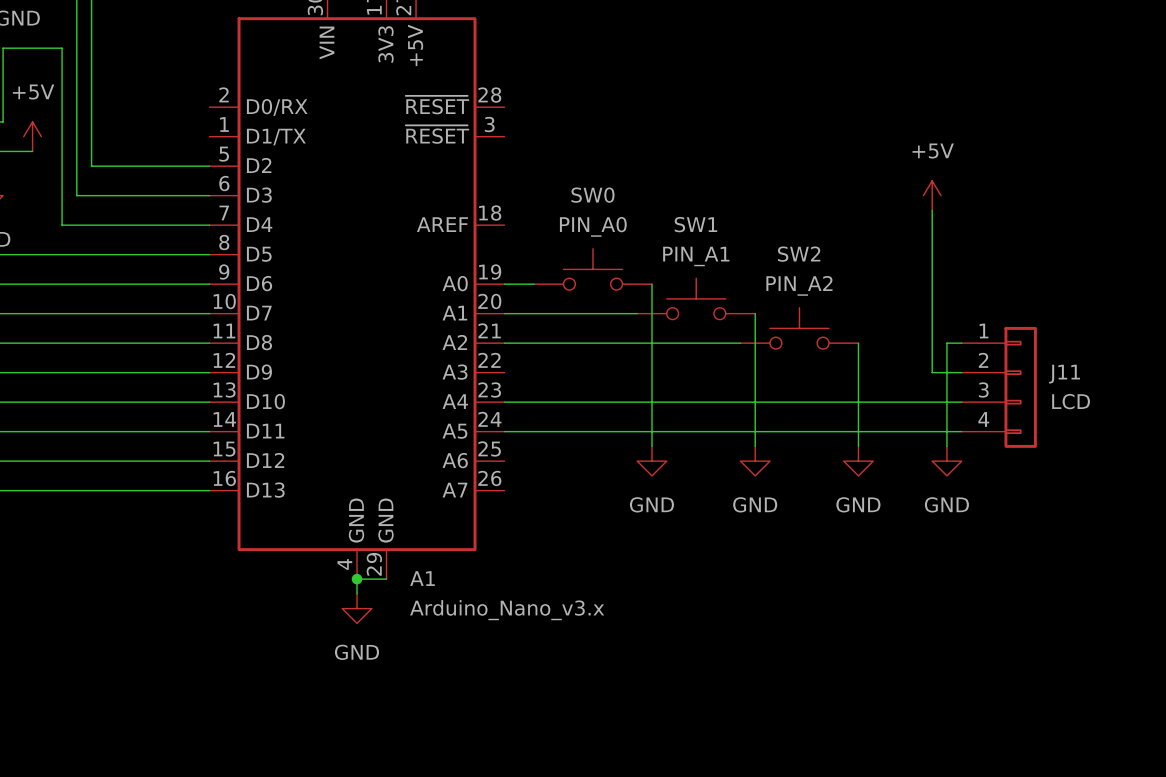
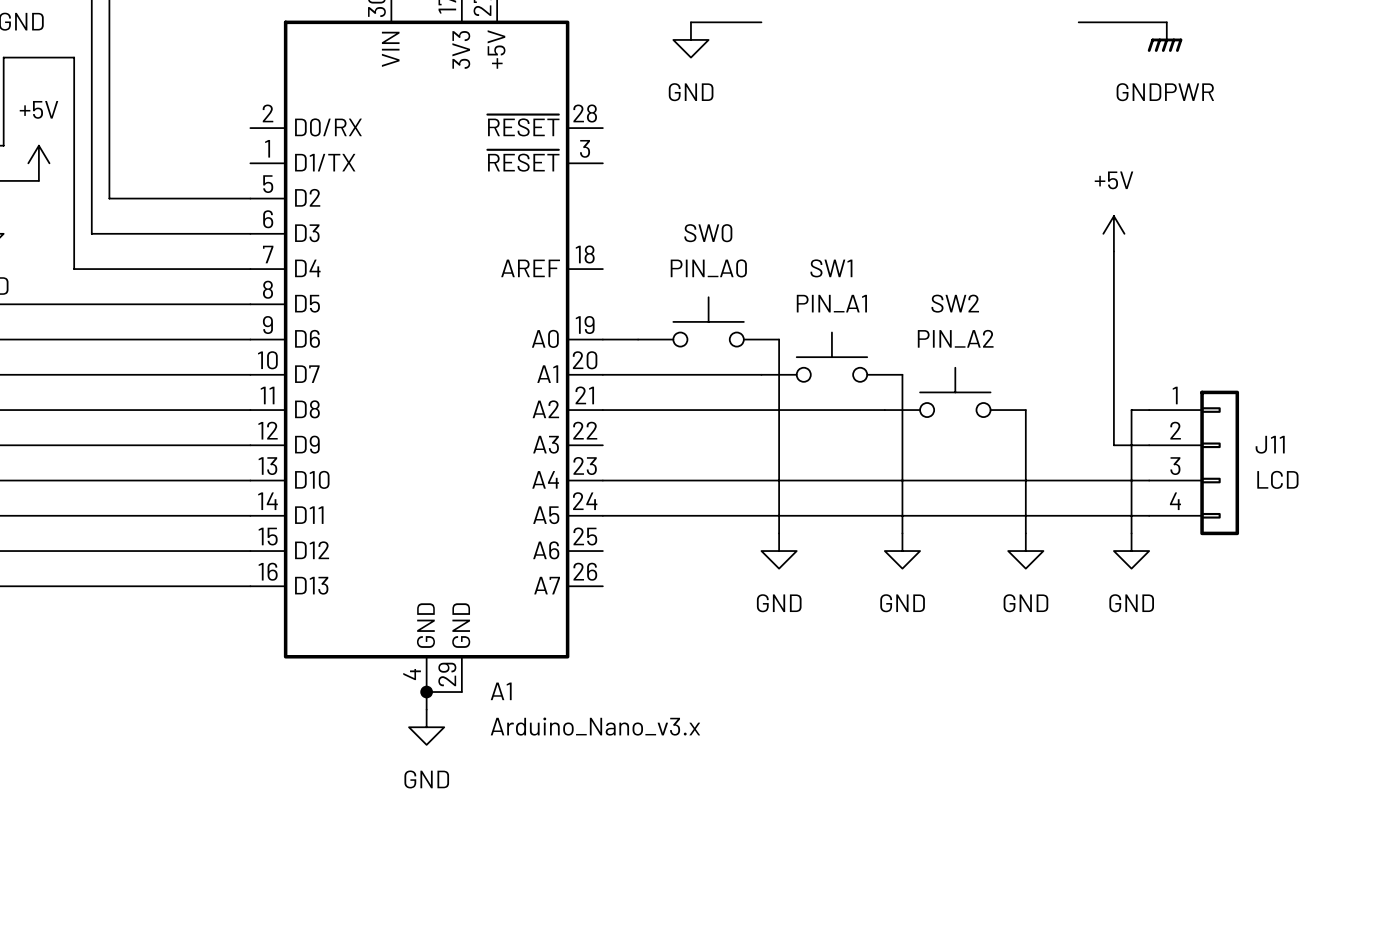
wire: none -> (690, 22) (761, 22)
wire: none -> (1078, 22) (1166, 22)
power symbol: none -> GNDPWR (1165, 37)
power symbol: none -> GND (690, 39)

